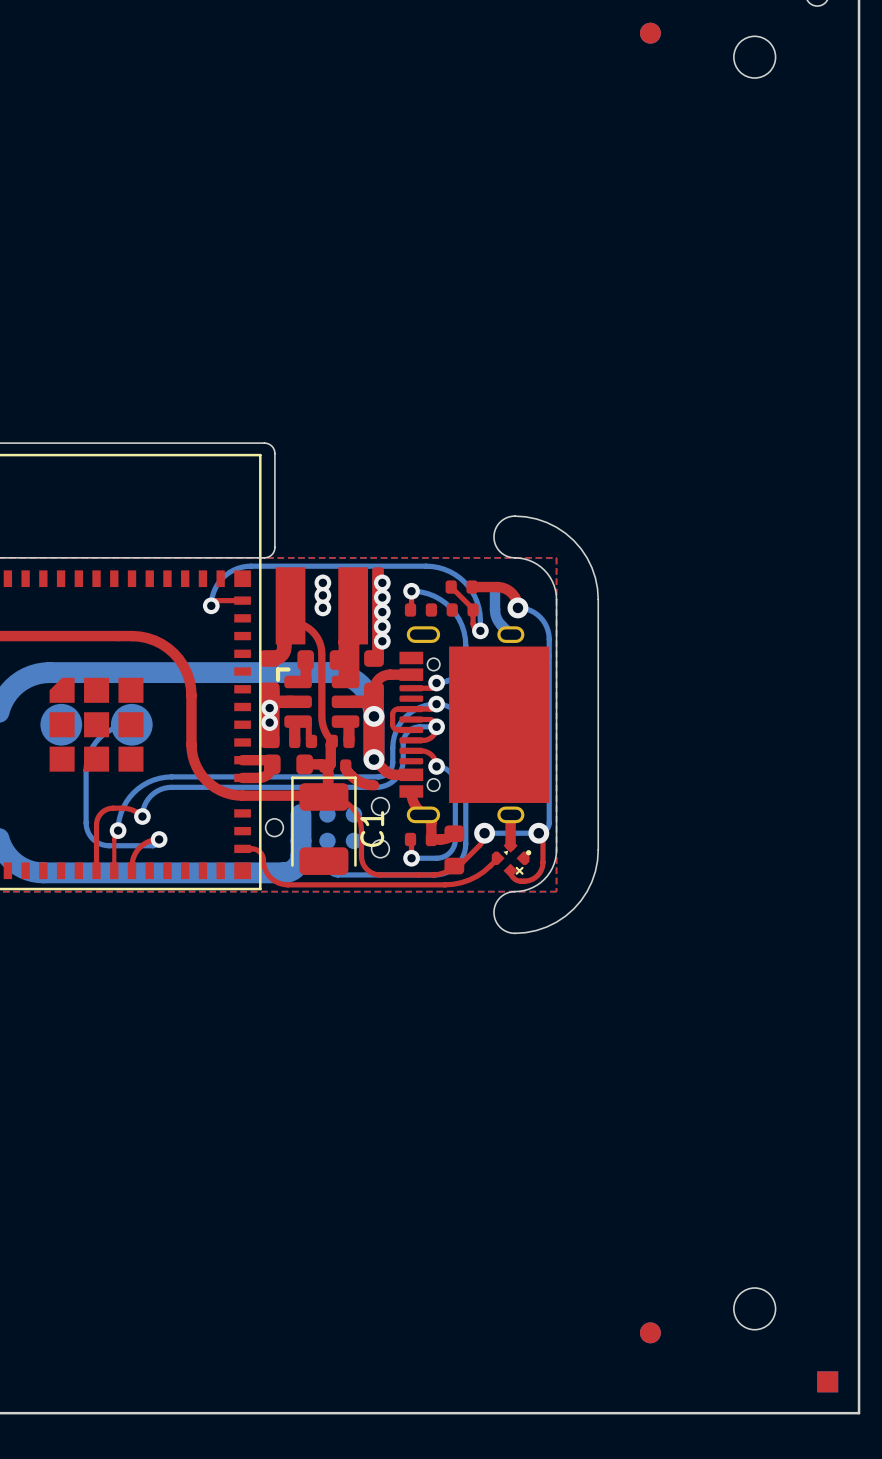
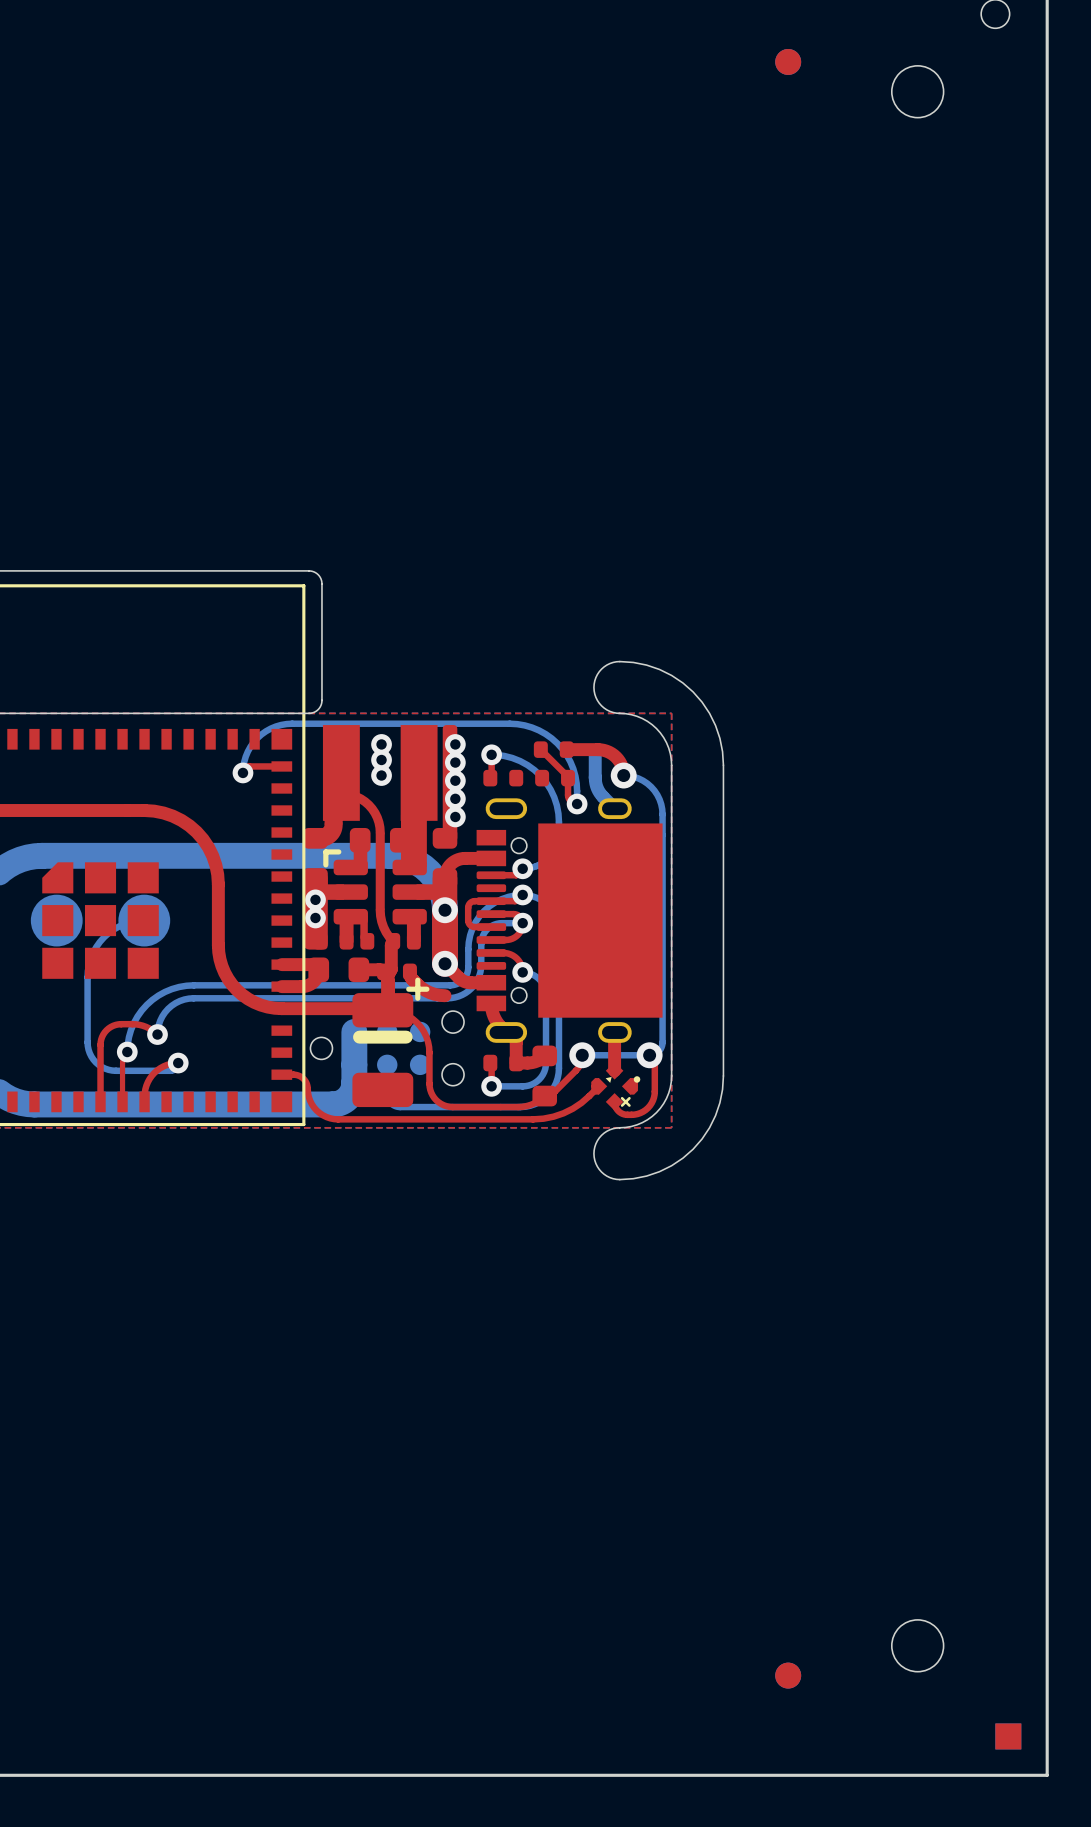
part: none -> (390, 1042)
C1: (323, 825) -> none

